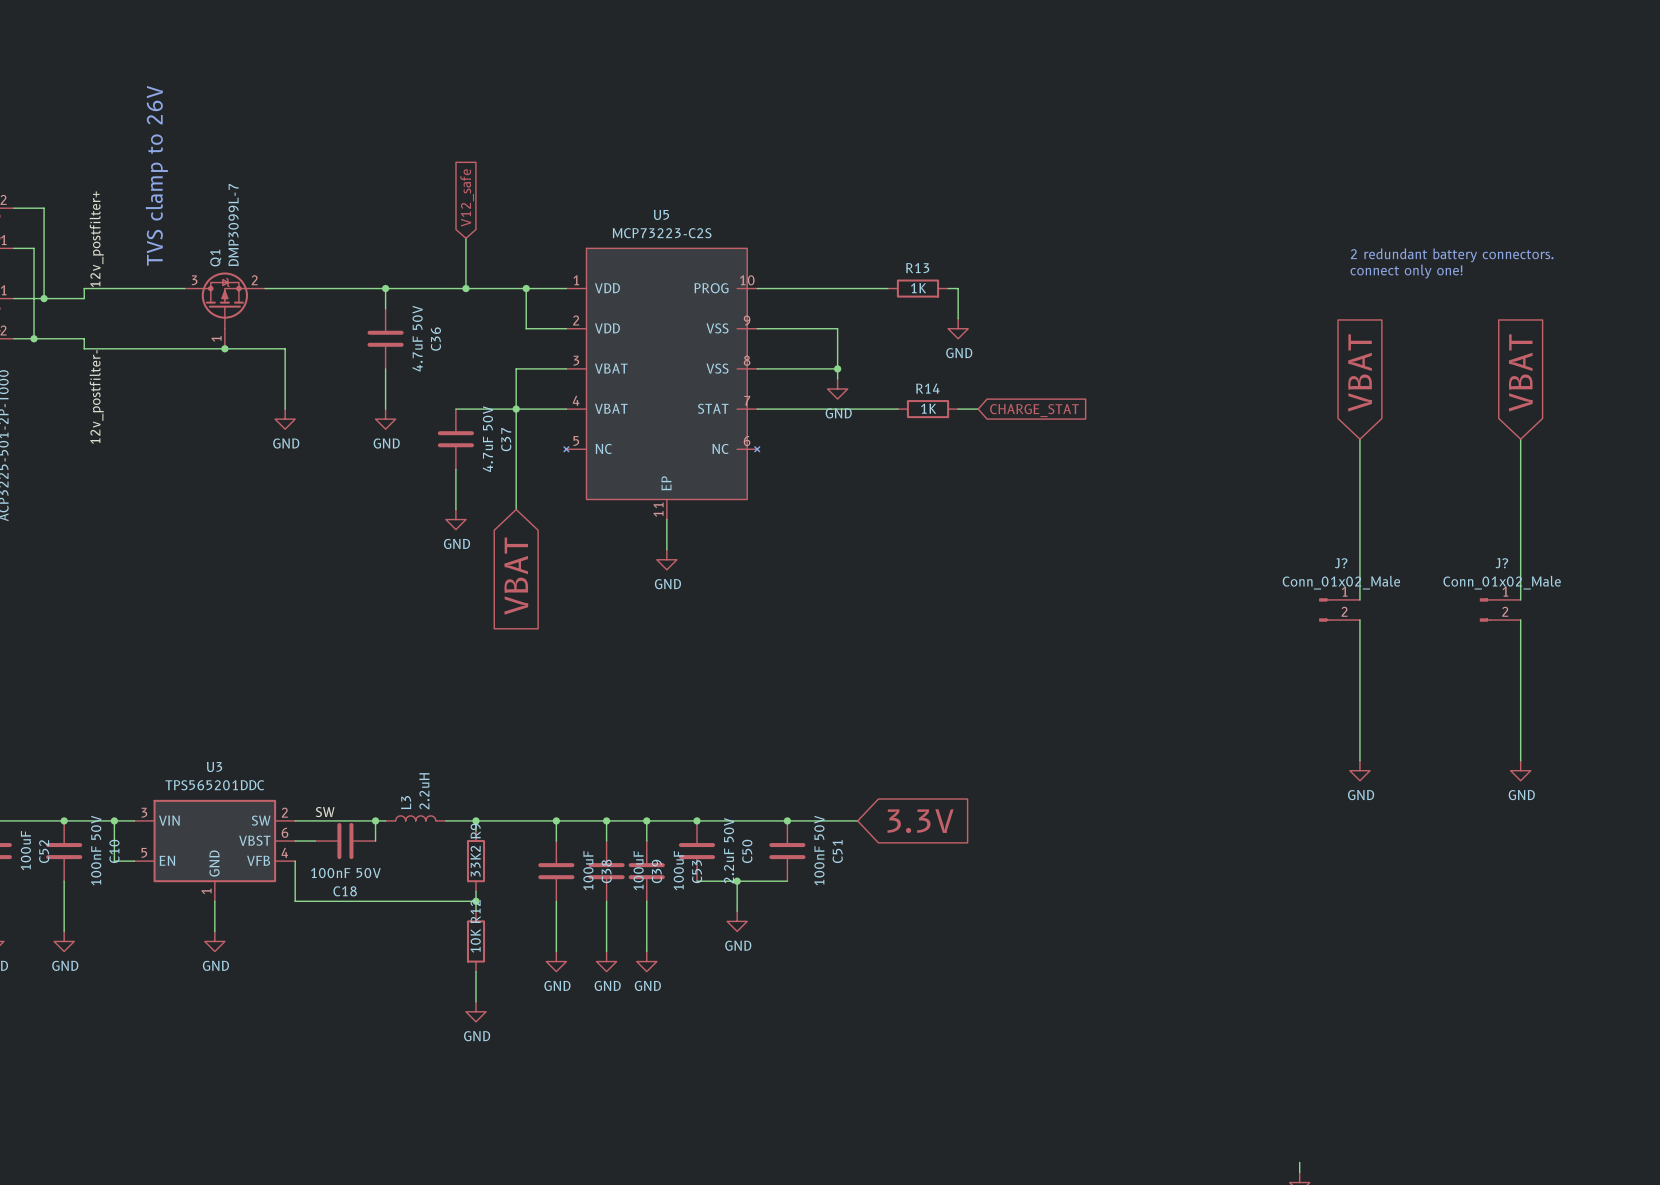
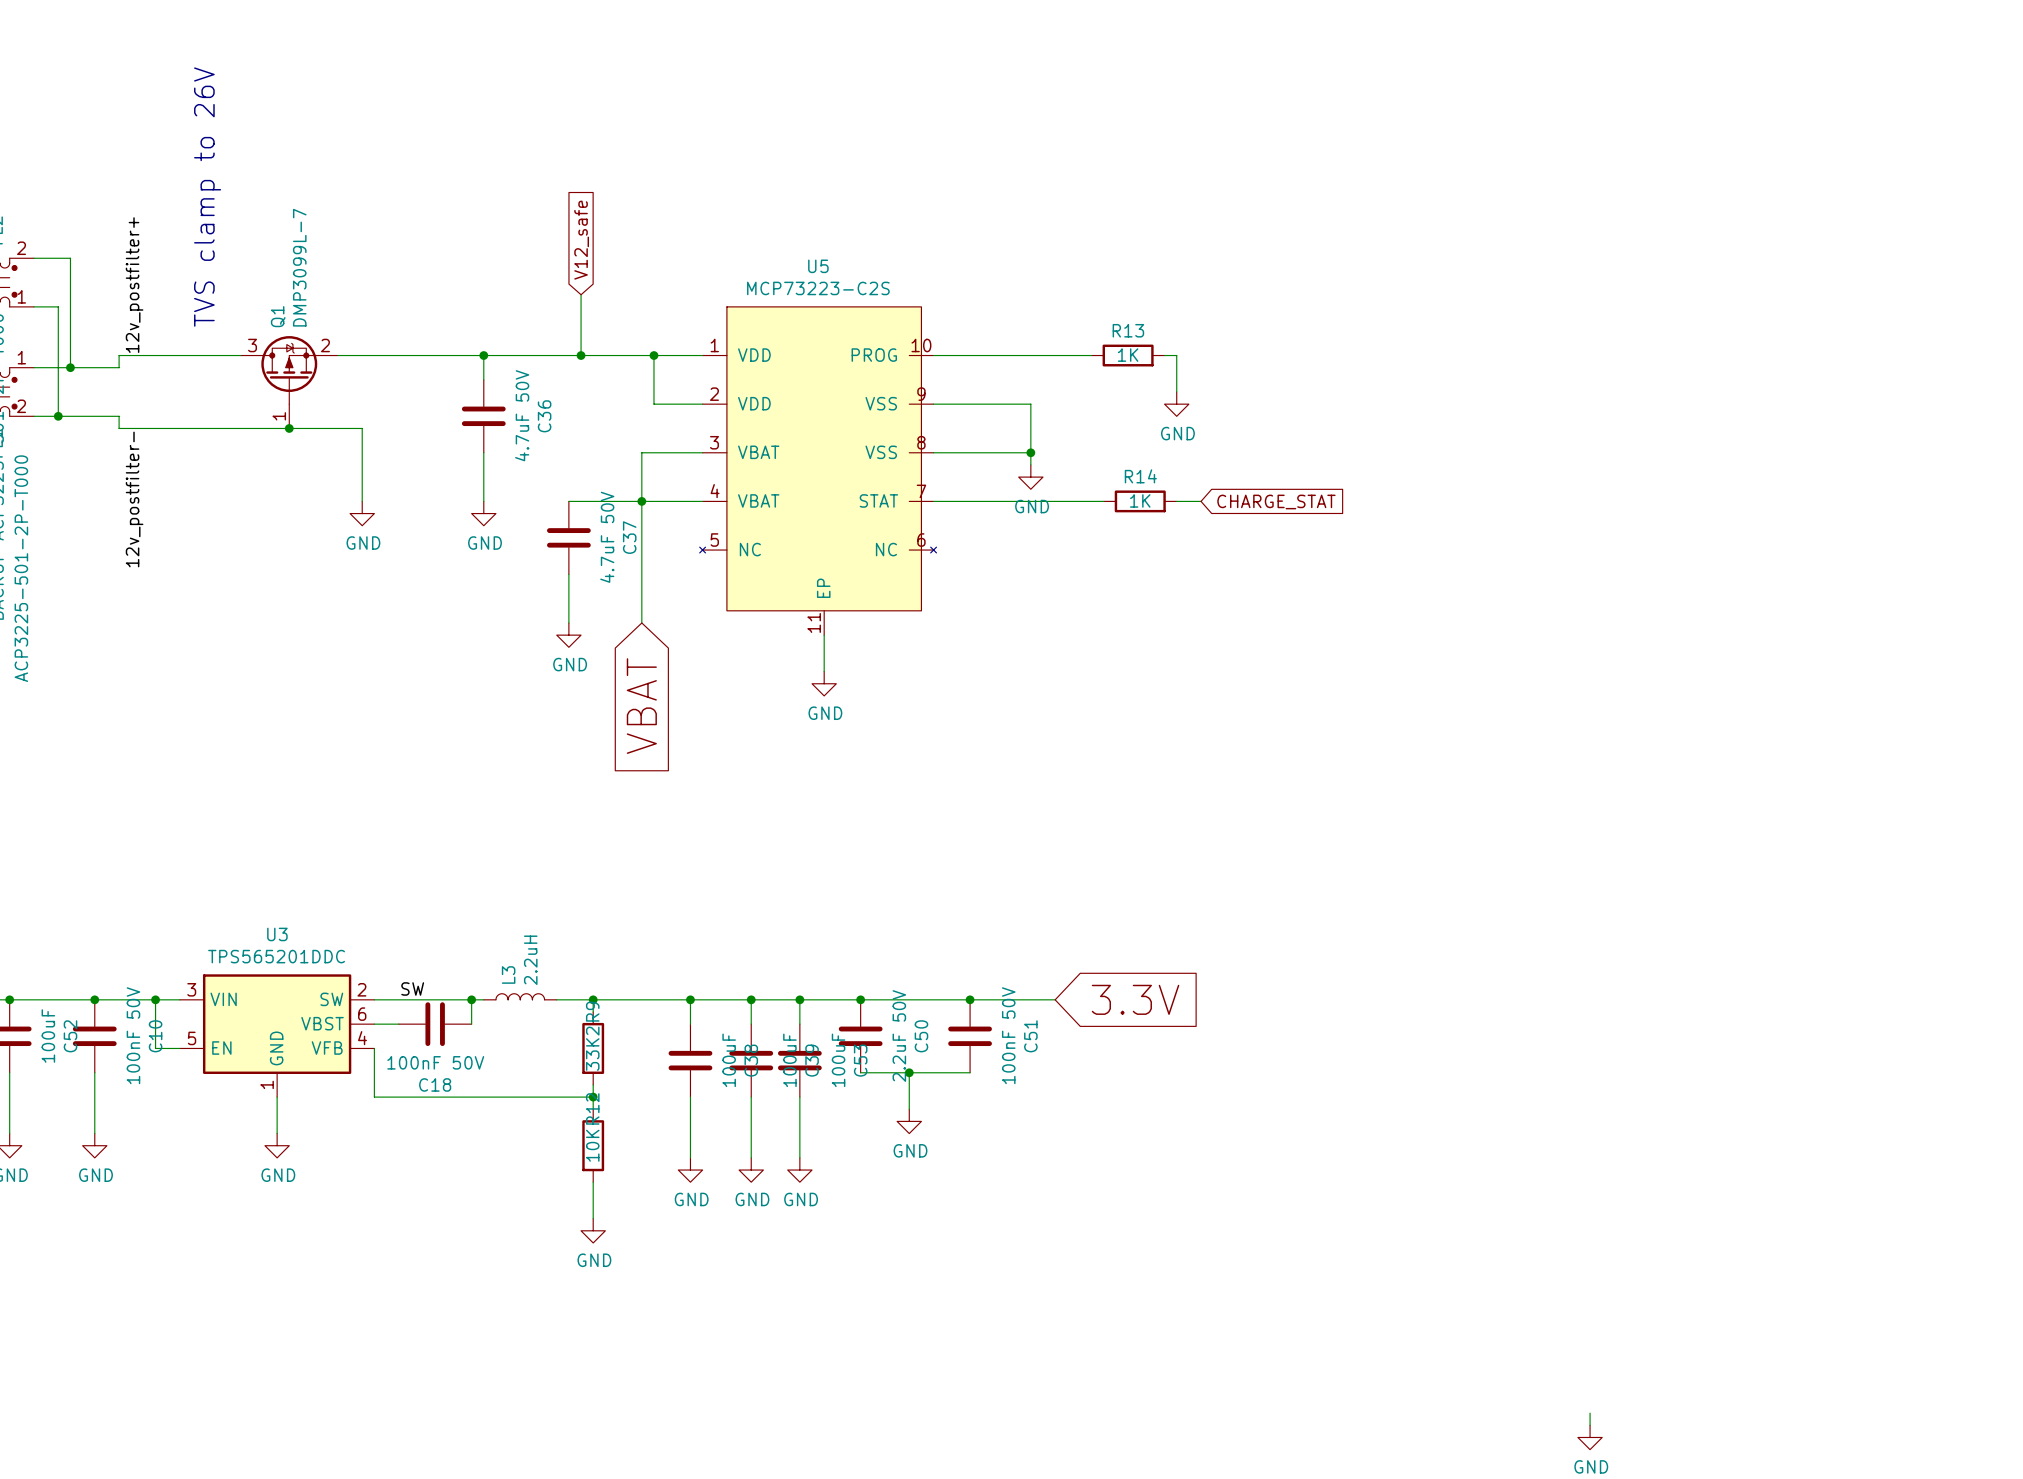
text: 2 redundant battery connectors. (1452, 255) -> none
text: connect only one! (1406, 271) -> none
global label: VBAT (1360, 372) -> none
global label: VBAT (1520, 372) -> none
wire: (1359, 439) (1359, 599) -> none
wire: (1520, 439) (1520, 599) -> none
J?: Conn_01x02_Male (1339, 609) -> none
J?: Conn_01x02_Male (1500, 609) -> none
wire: (1359, 620) (1359, 760) -> none
wire: (1520, 620) (1520, 760) -> none
power symbol: GND (1359, 770) -> none
power symbol: GND (1520, 770) -> none

